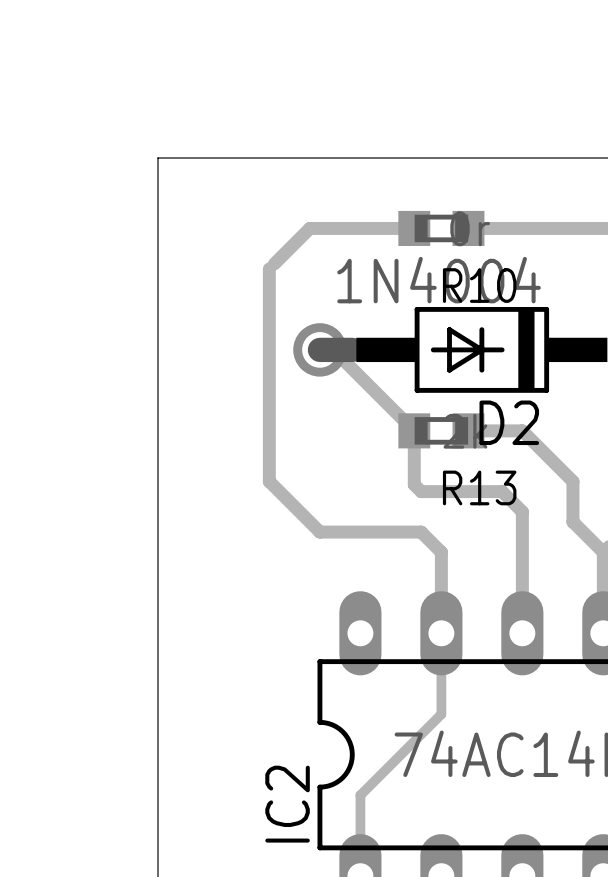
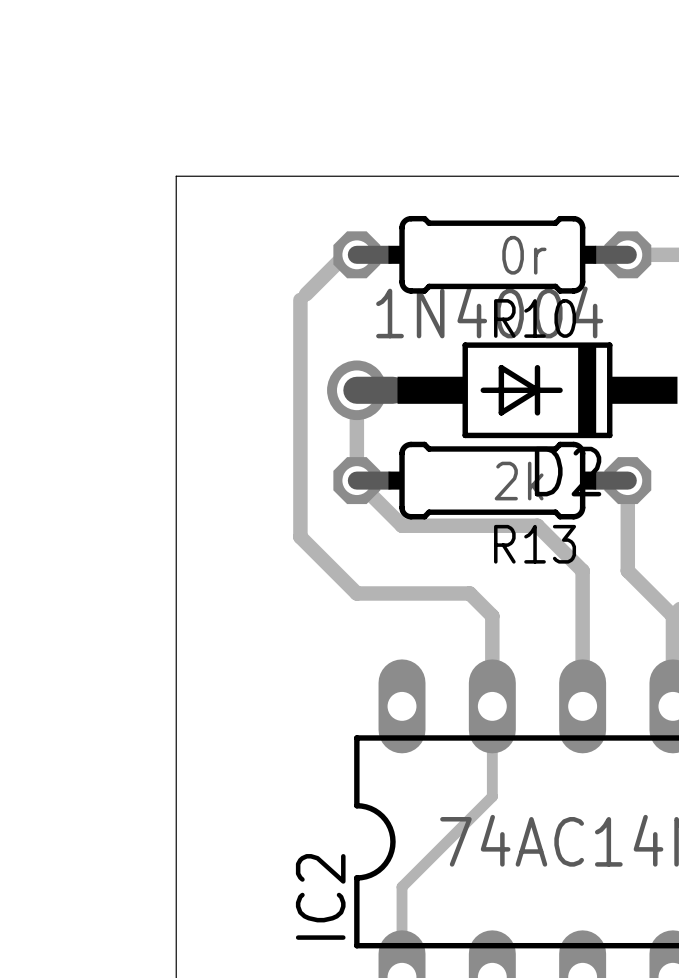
R10 footprint: [398, 210, 485, 246] -> [333, 215, 652, 294]
track: (319, 228) (414, 228) -> none
track: (468, 228) (562, 228) -> none
track: (319, 349) (333, 349) (414, 430) (414, 484) (421, 491) (502, 491) -> (356, 390) (356, 480) (402, 525) (537, 525) (560, 548)
R13 footprint: [398, 413, 485, 449] -> [333, 441, 652, 520]
track: (468, 430) (522, 430) (572, 481) (572, 521) -> (627, 480) (627, 570) (639, 582)

